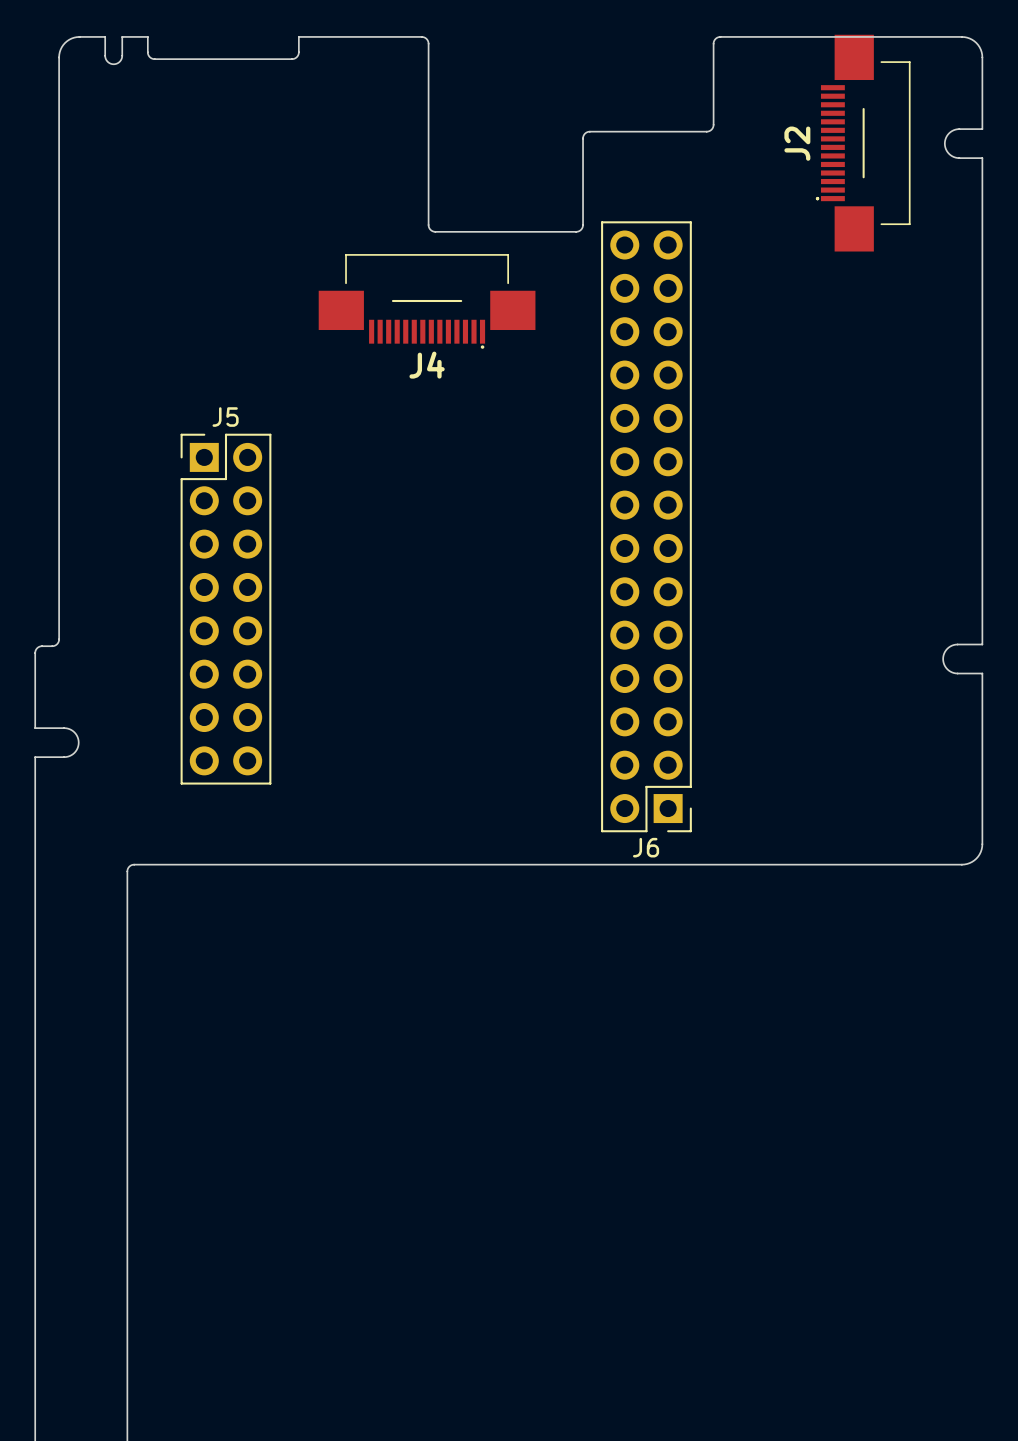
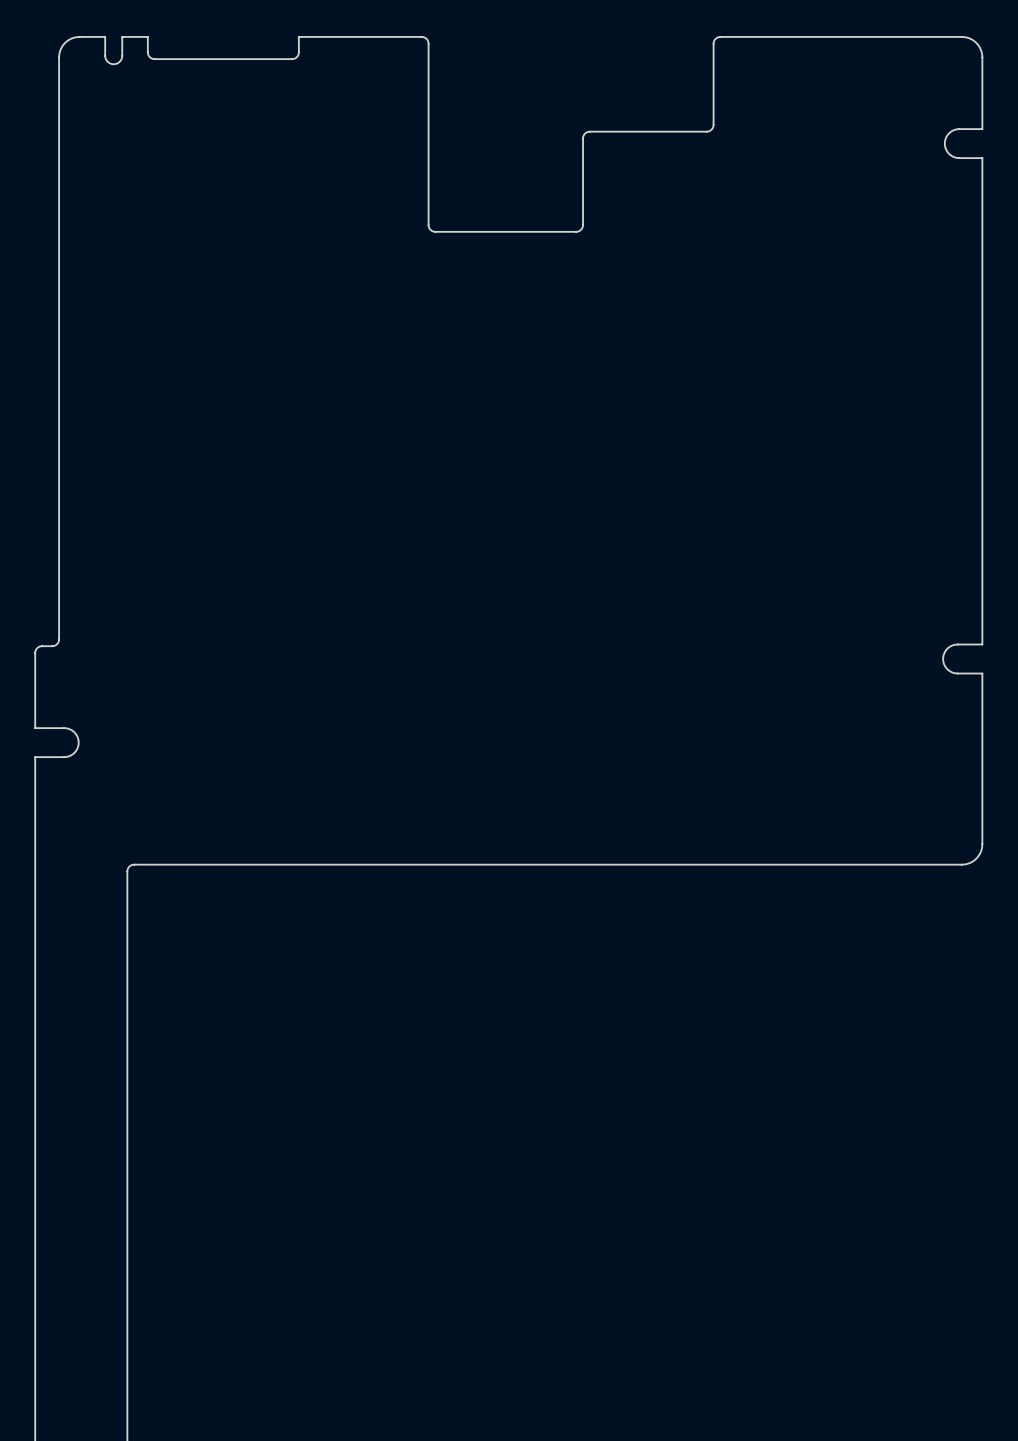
J2: (863, 143) -> none
J4: (427, 301) -> none
J6: (646, 526) -> none
J5: (225, 609) -> none

